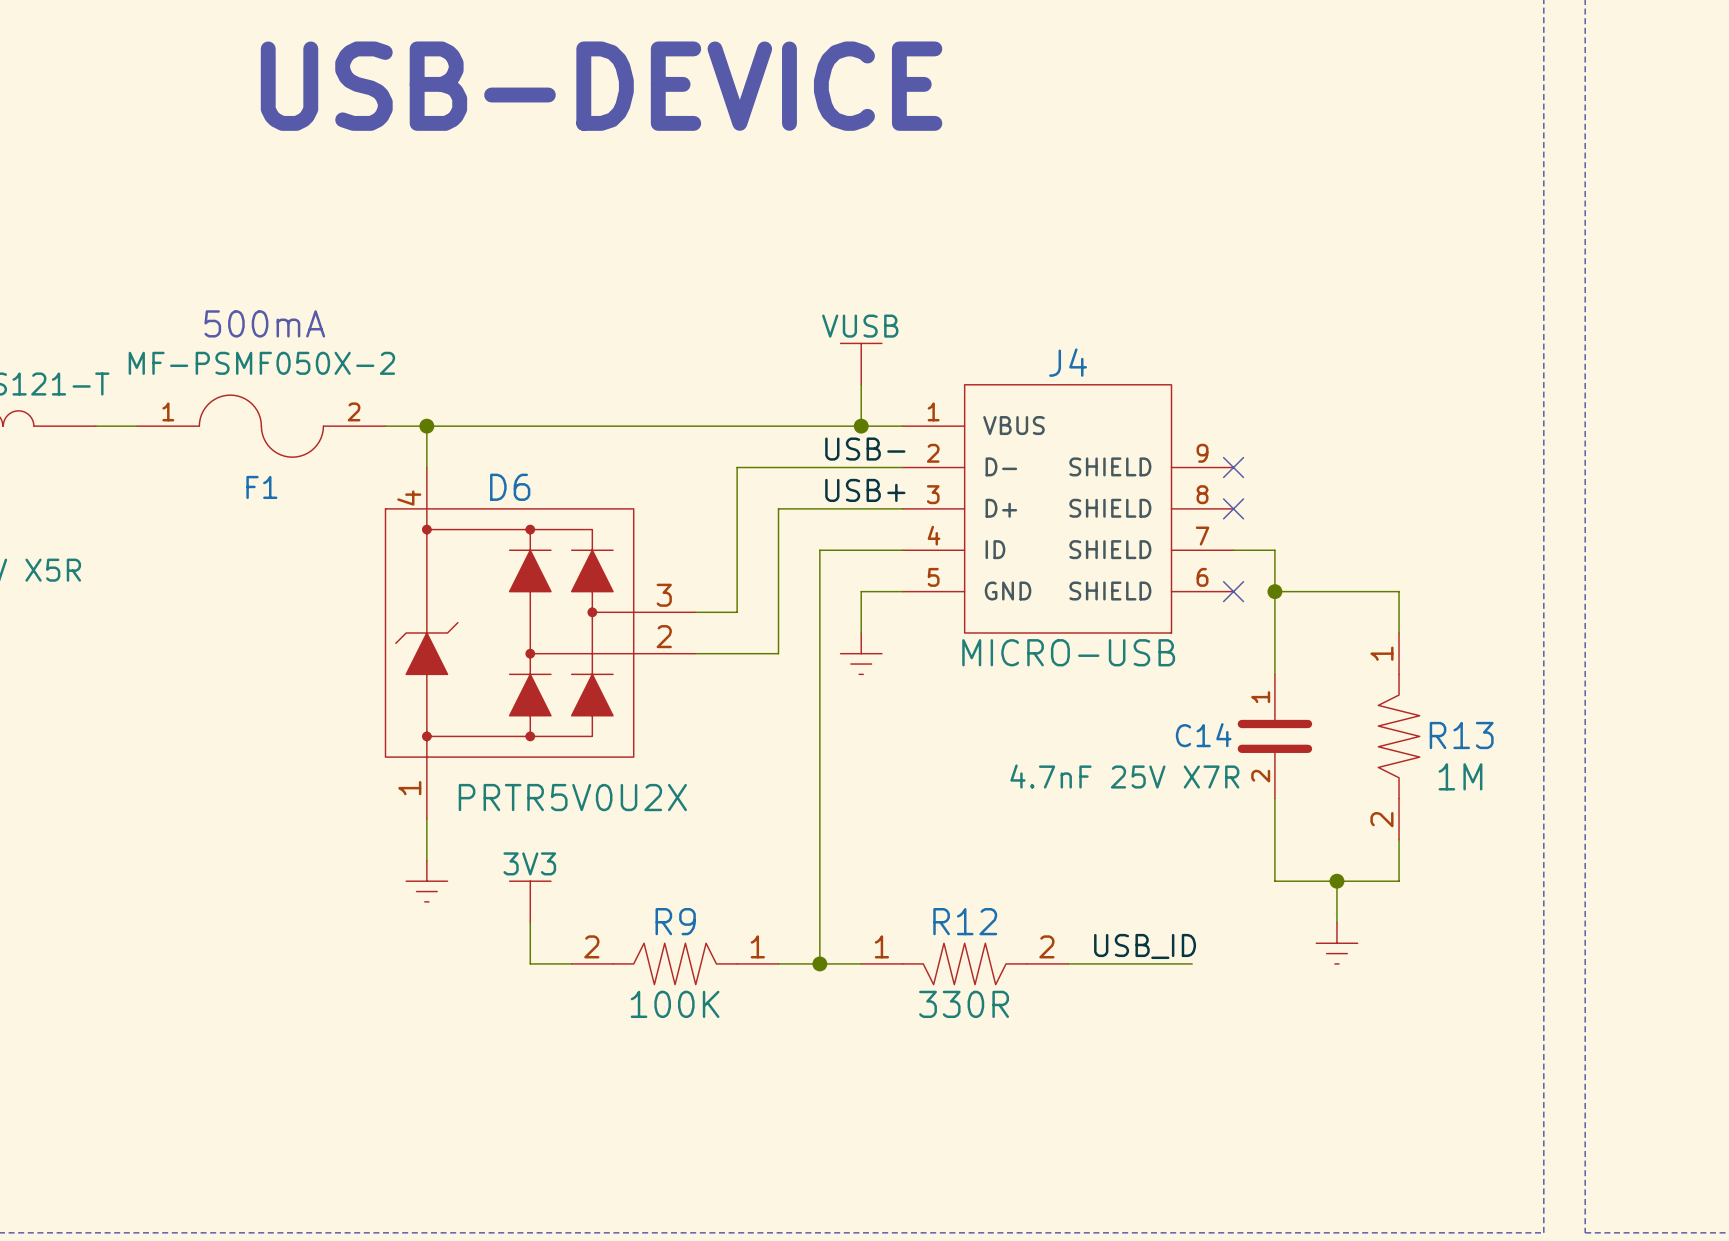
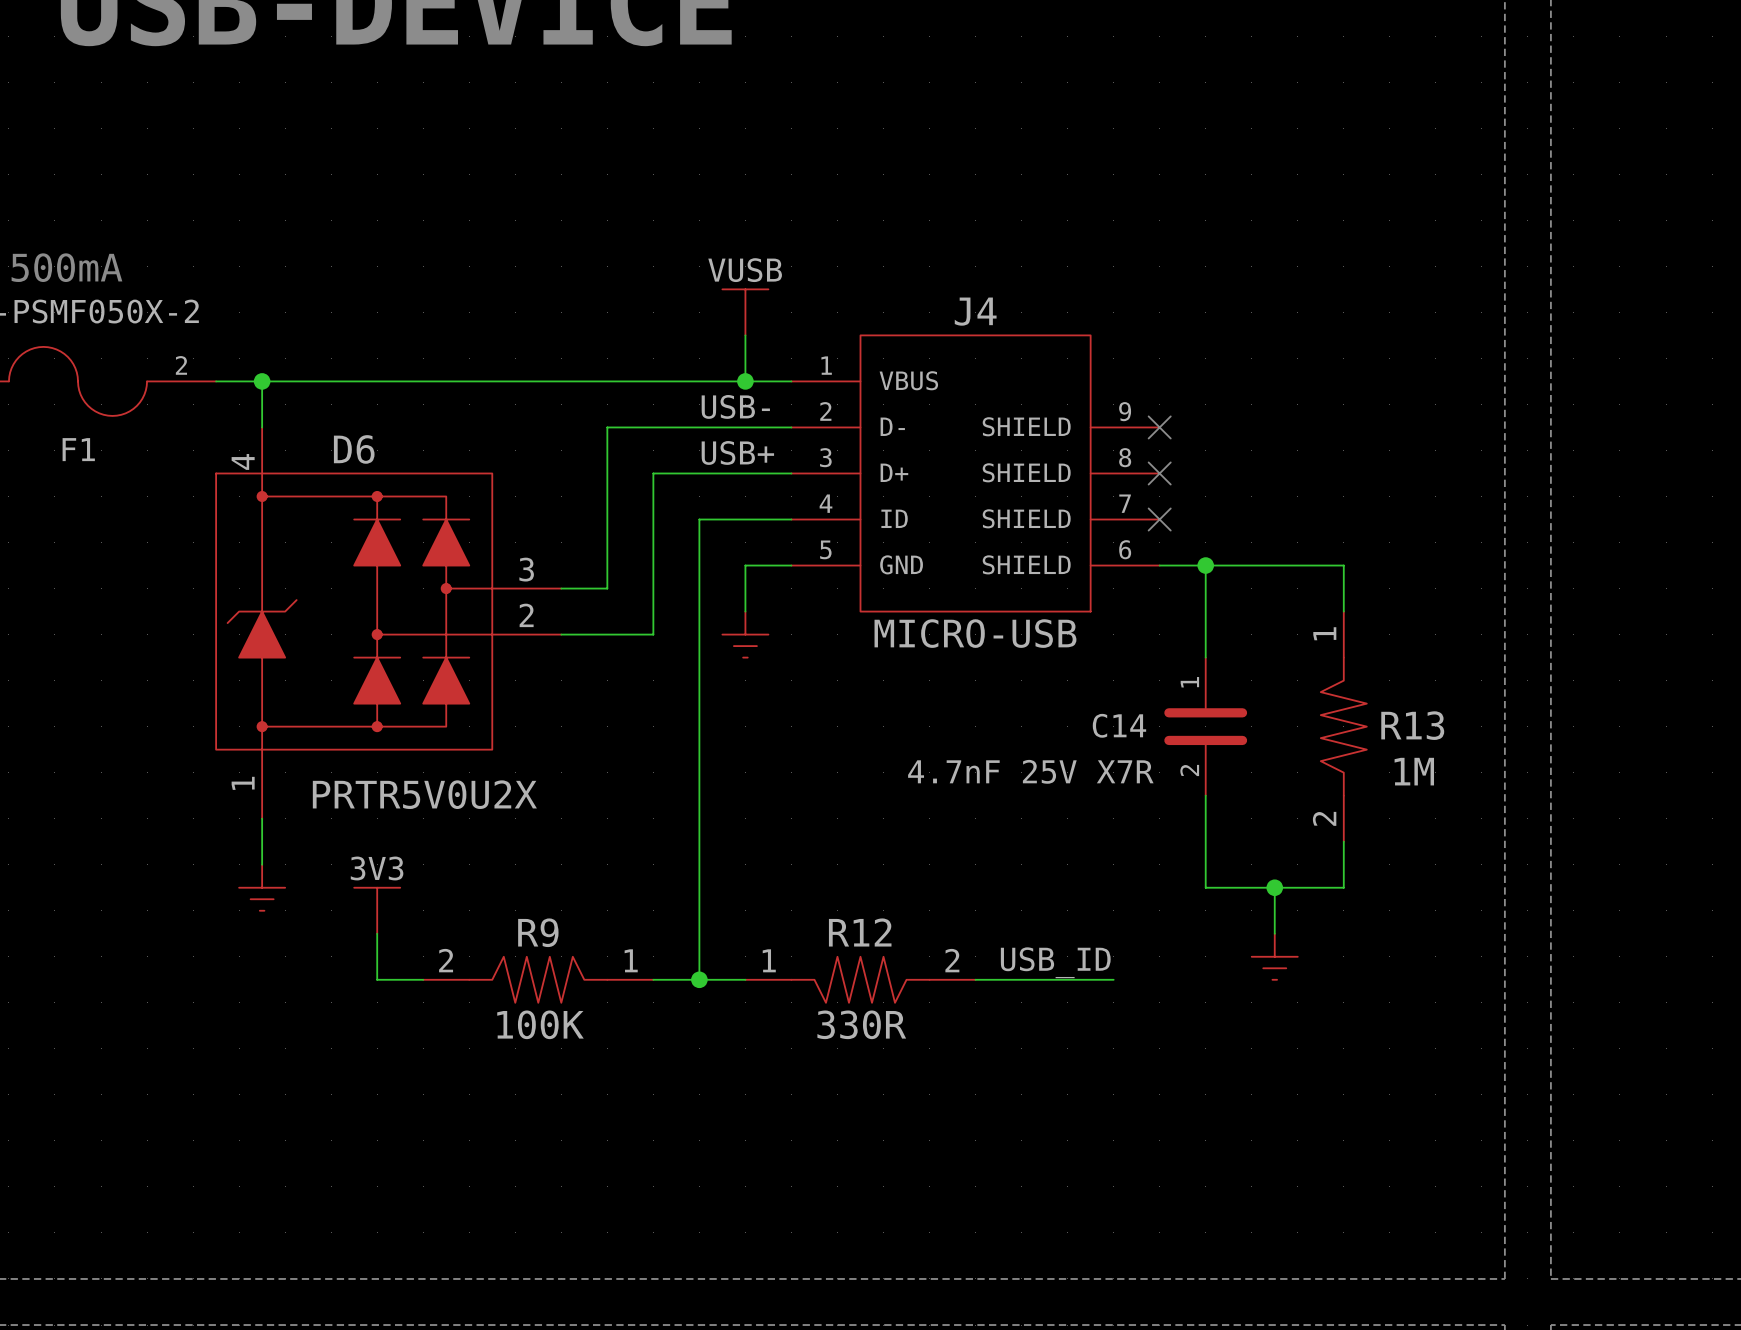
wire: (1233, 550) (1274, 550) (1274, 591) -> (1159, 565) (1205, 565)
no-connect mark position: (1233, 591) -> (1159, 519)

